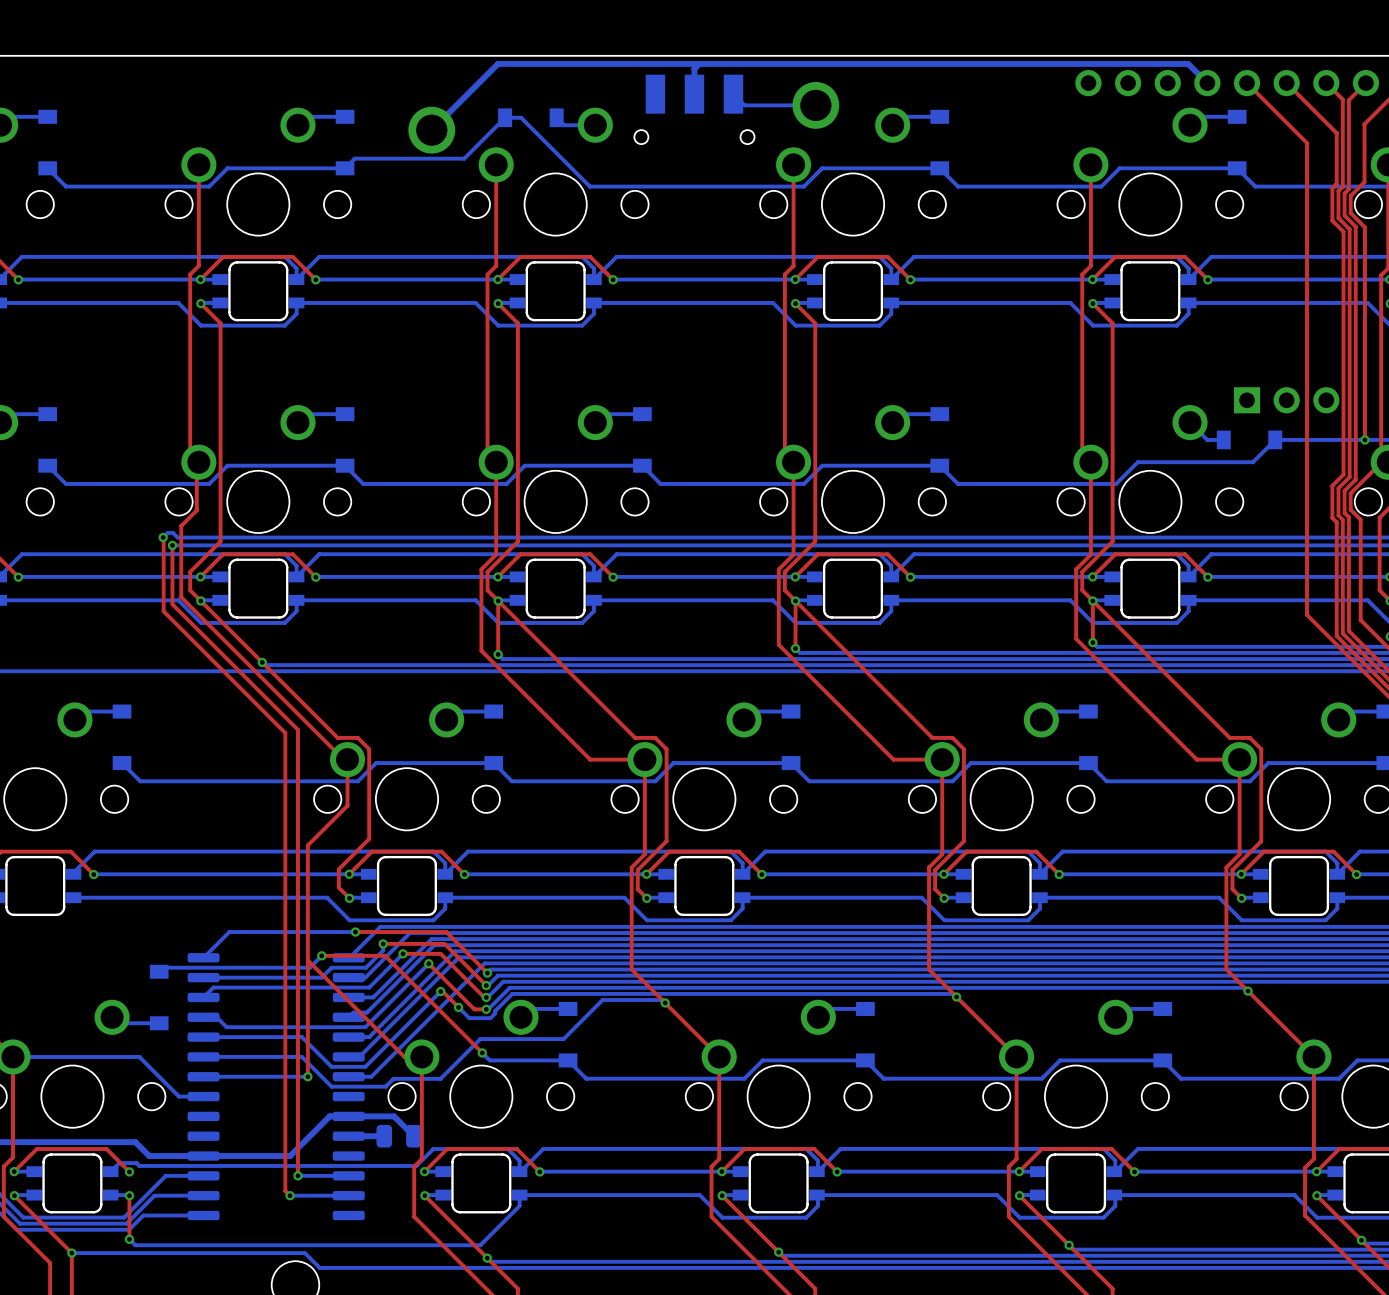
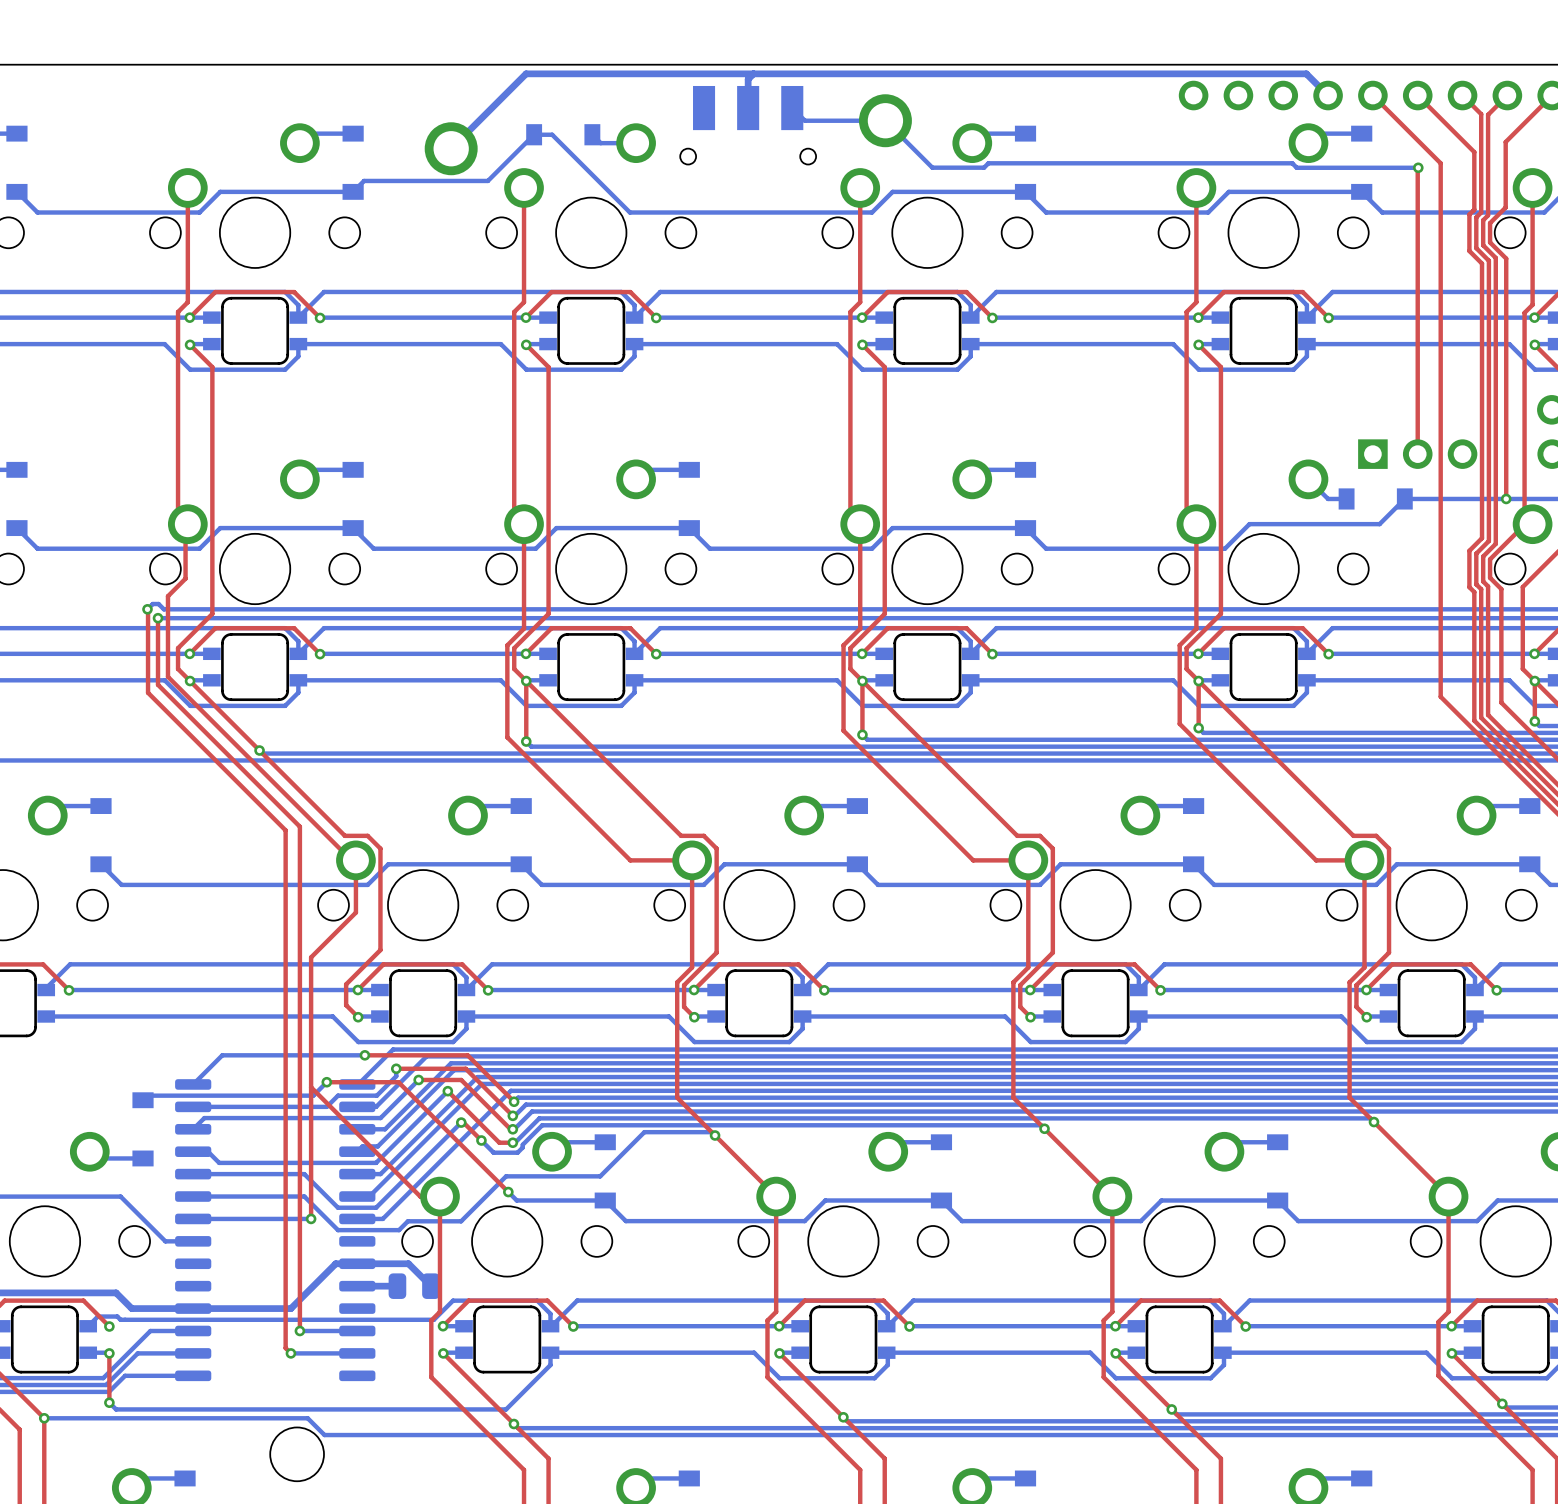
bottom track: none -> (885, 120) (932, 167) (984, 167) (988, 163) (1292, 163) (1296, 167) (1418, 167)
top track: none -> (1418, 167) (1417, 454)
via: none -> (1418, 167)

